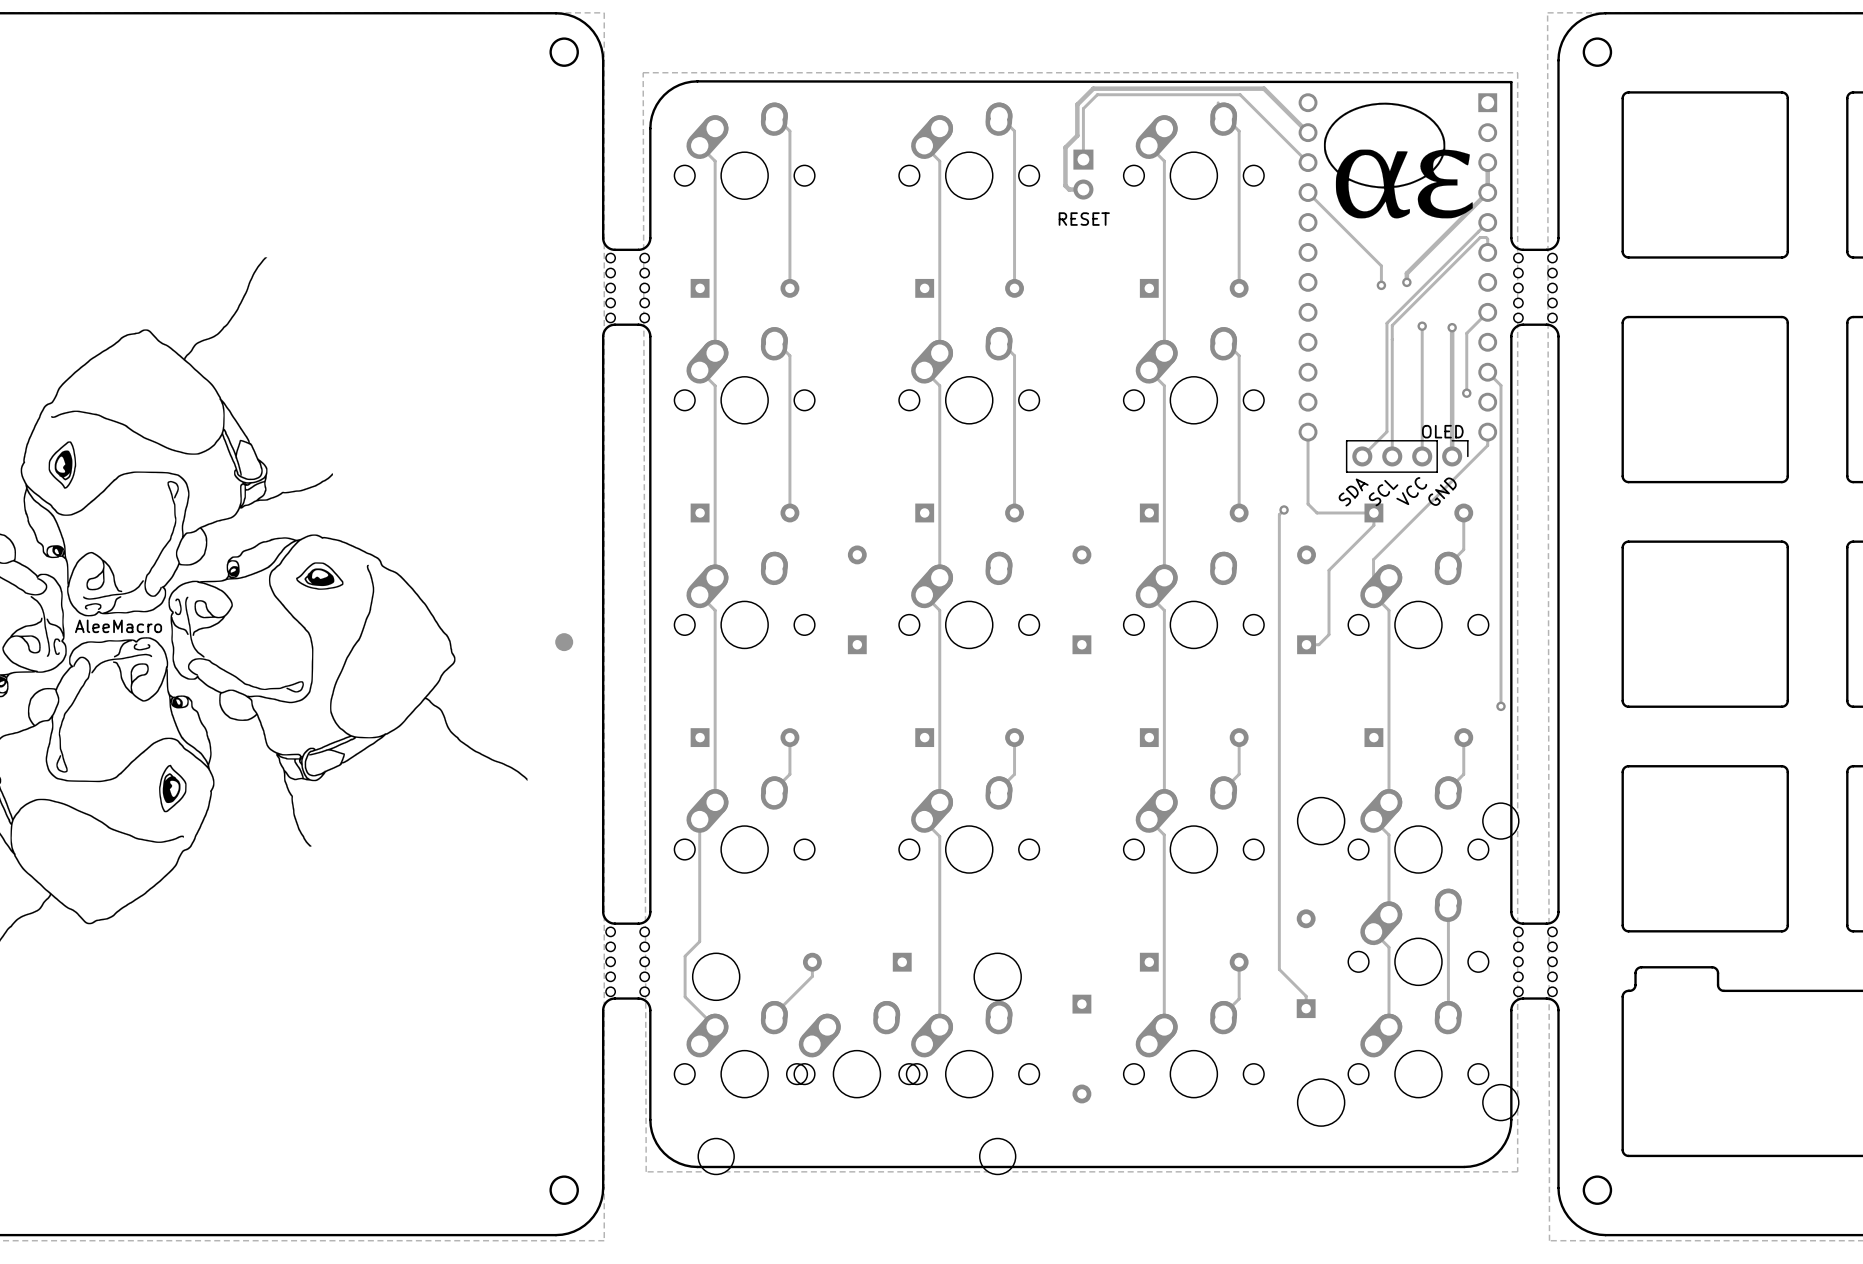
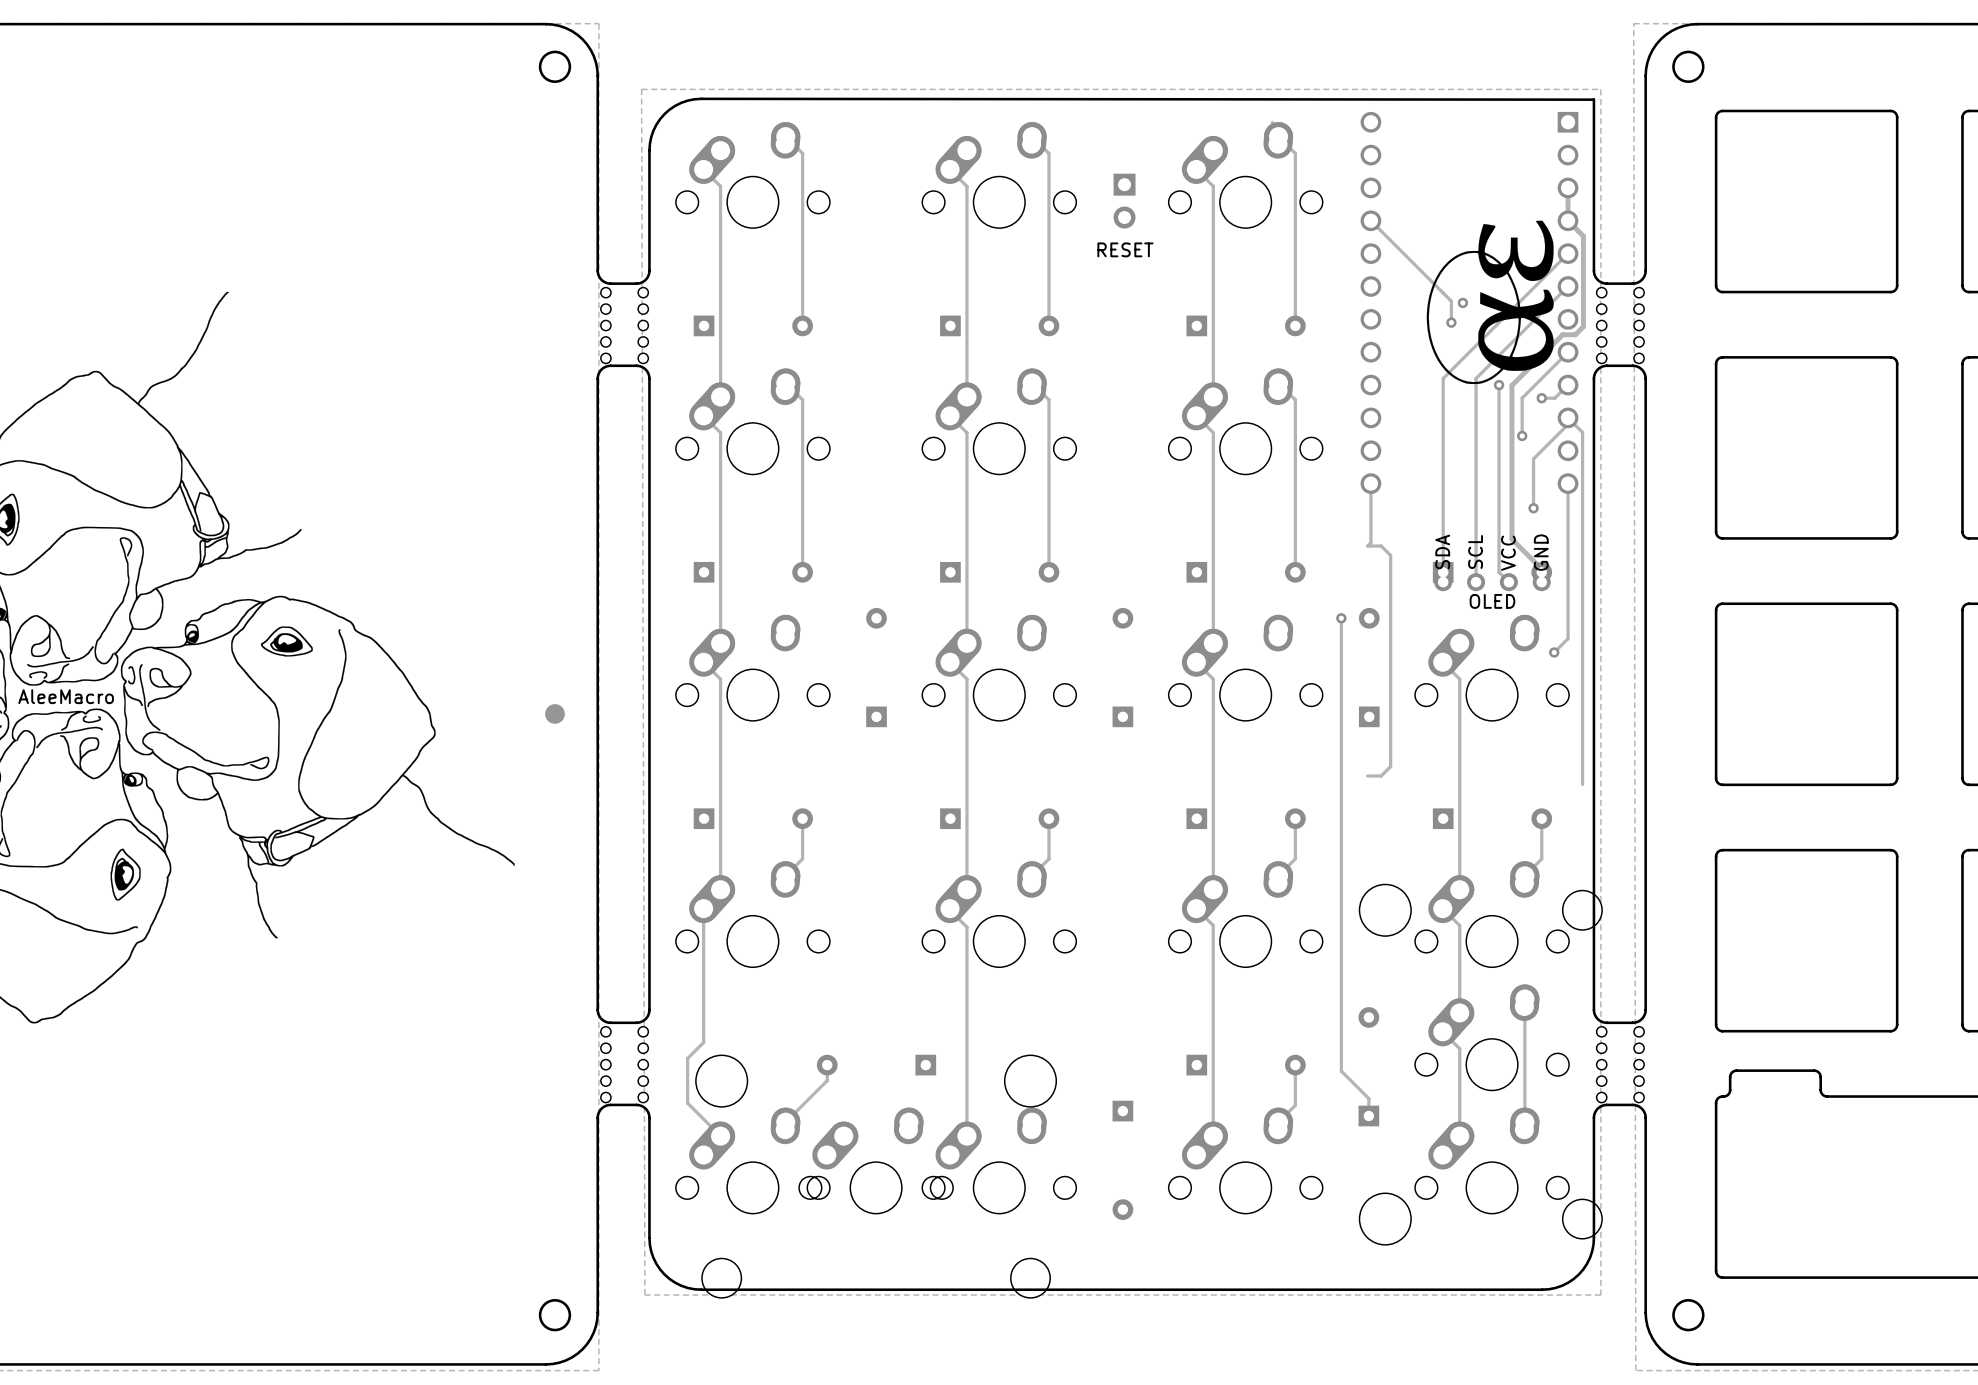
drawing: [1323, 102, 1473, 219] -> none
track: (1308, 132) (1264, 88) (1093, 88) (1077, 104) (1077, 135) (1065, 147) (1065, 185) (1069, 189) (1083, 189) -> none
track: (1083, 159) (1083, 108) (1097, 94) (1240, 94) (1308, 162) -> none
drawing: none -> [1426, 220, 1554, 385]
track: (1487, 192) (1406, 273) (1406, 282) -> (1568, 220) (1583, 236) (1583, 326) (1575, 334) (1562, 334) (1511, 385) (1511, 539) (1541, 569) (1541, 572)
track: (1487, 252) (1487, 239) (1480, 237) (1392, 325) (1392, 456) -> (1568, 286) (1476, 378) (1476, 582)
via position: (1406, 282) -> (1462, 302)
track: (1386, 323) (1386, 431) (1362, 456) -> (1457, 364) (1443, 378) (1443, 572)
track: (1422, 326) (1422, 456) -> none
via: (1422, 326) -> none
track: (1452, 327) (1452, 456) -> none
via: (1452, 327) -> none
track: (1466, 333) (1466, 393) -> (1545, 375) (1522, 398) (1522, 435)
track: none -> (1499, 385) (1499, 572) (1508, 582)
via: none -> (1499, 385)
track: none -> (1568, 385) (1554, 398) (1541, 398)
via: none -> (1541, 398)
track: none -> (1568, 424) (1533, 458) (1533, 508)
via: none -> (1522, 435)
via: (1466, 393) -> none
track: (1487, 445) (1373, 559) (1373, 594) -> (1568, 498) (1568, 638) (1554, 652)
via: none -> (1533, 508)
OLED: (1407, 456) -> none
track: (1308, 486) (1308, 504) (1317, 512) (1373, 512) -> (1370, 542) (1367, 546) (1381, 546) (1390, 555) (1390, 766) (1381, 775) (1367, 775)
text rotation: 0° (1411, 491) -> 45° counterclockwise (1508, 553)
text rotation: 0° (1442, 491) -> 45° counterclockwise (1541, 552)
text rotation: 0° (1353, 492) -> 45° counterclockwise (1442, 551)
text rotation: 0° (1383, 493) -> 45° counterclockwise (1475, 551)
track: (1284, 509) (1279, 514) (1279, 969) (1306, 996) -> (1341, 618) (1341, 1071) (1368, 1098) (1368, 1102)
via position: (1284, 509) -> (1341, 618)
track: (1373, 521) (1373, 525) (1329, 570) (1329, 634) (1318, 644) (1306, 644) -> none
OLED: none -> (1492, 582)
track: (1463, 521) (1463, 549) (1448, 565) -> none
via: none -> (1554, 652)
via: (1500, 706) -> none

